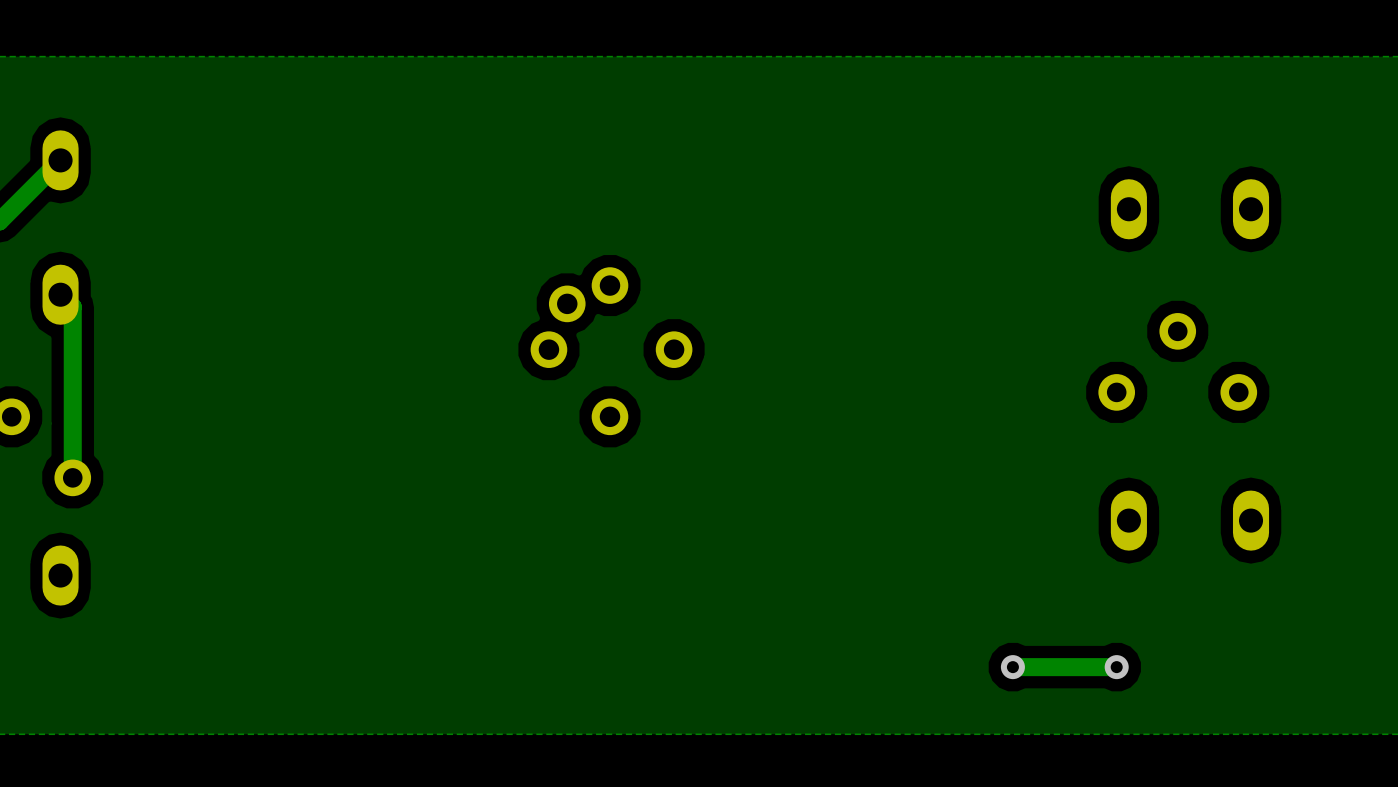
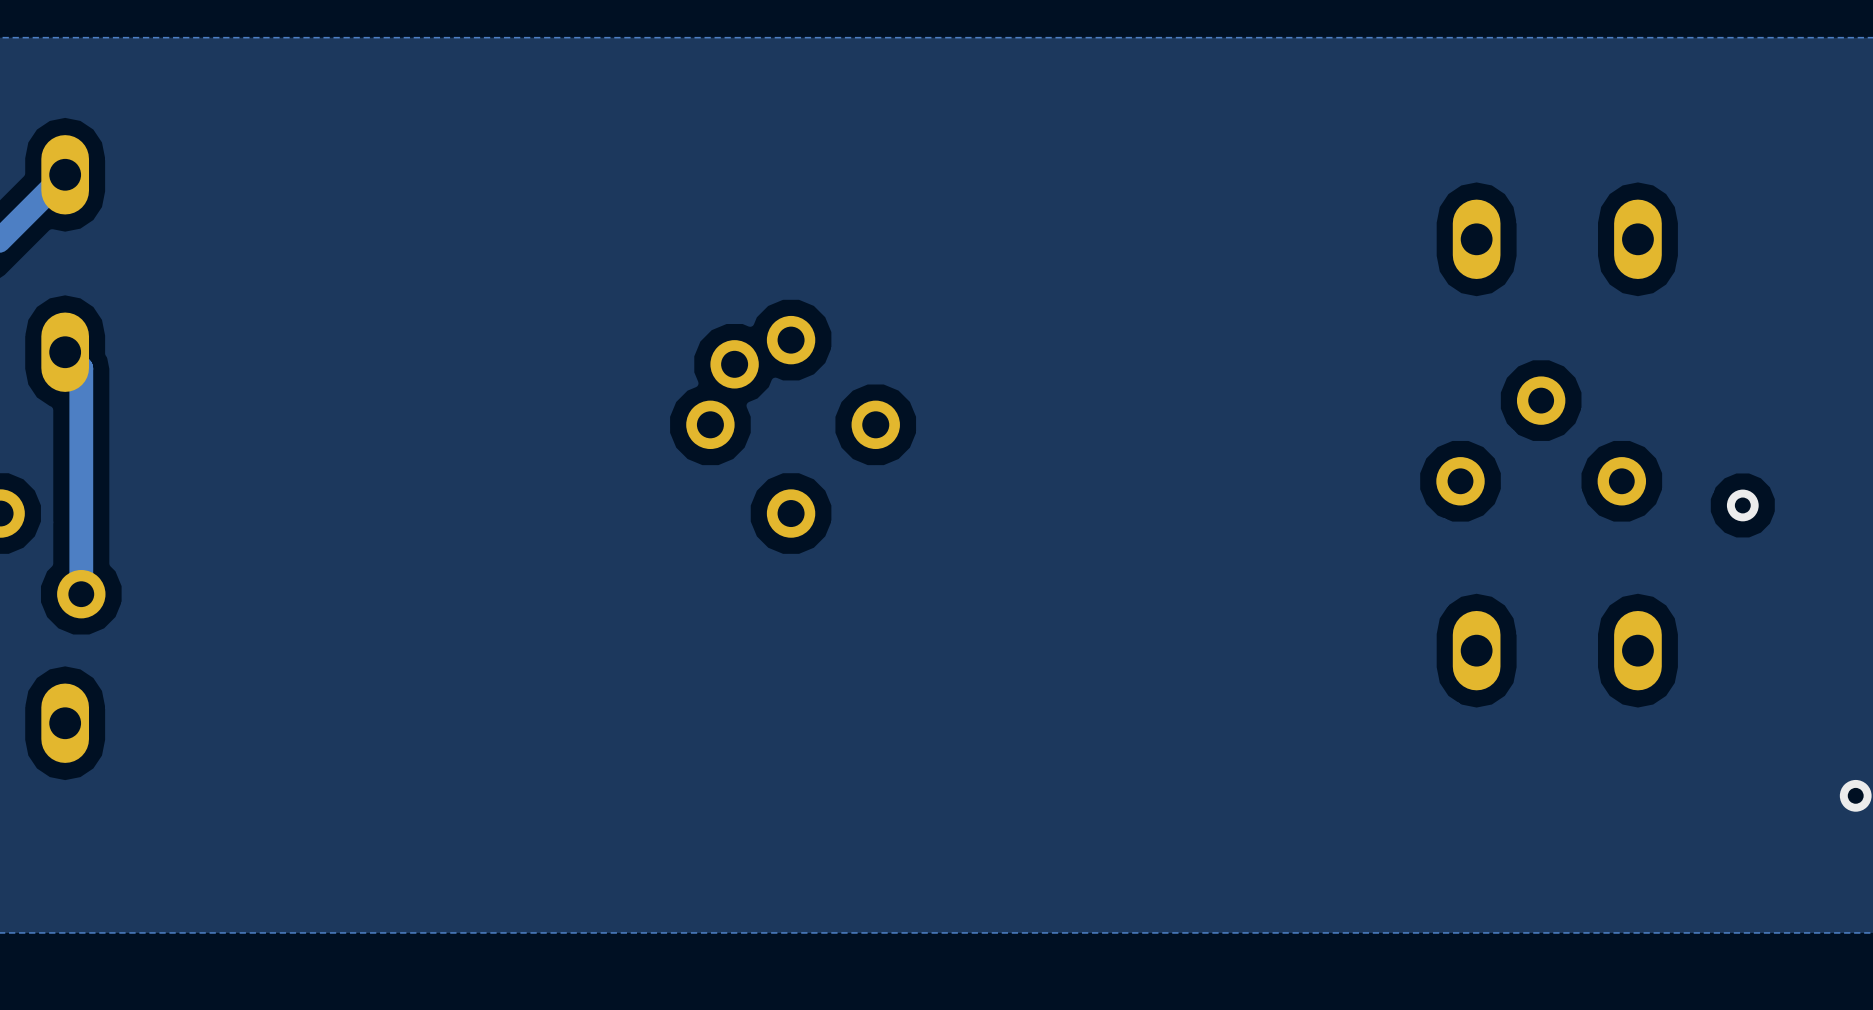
via: none -> (1742, 505)
via: (1012, 667) -> none
track: (1116, 667) (1012, 667) -> none
via: (1116, 667) -> none

